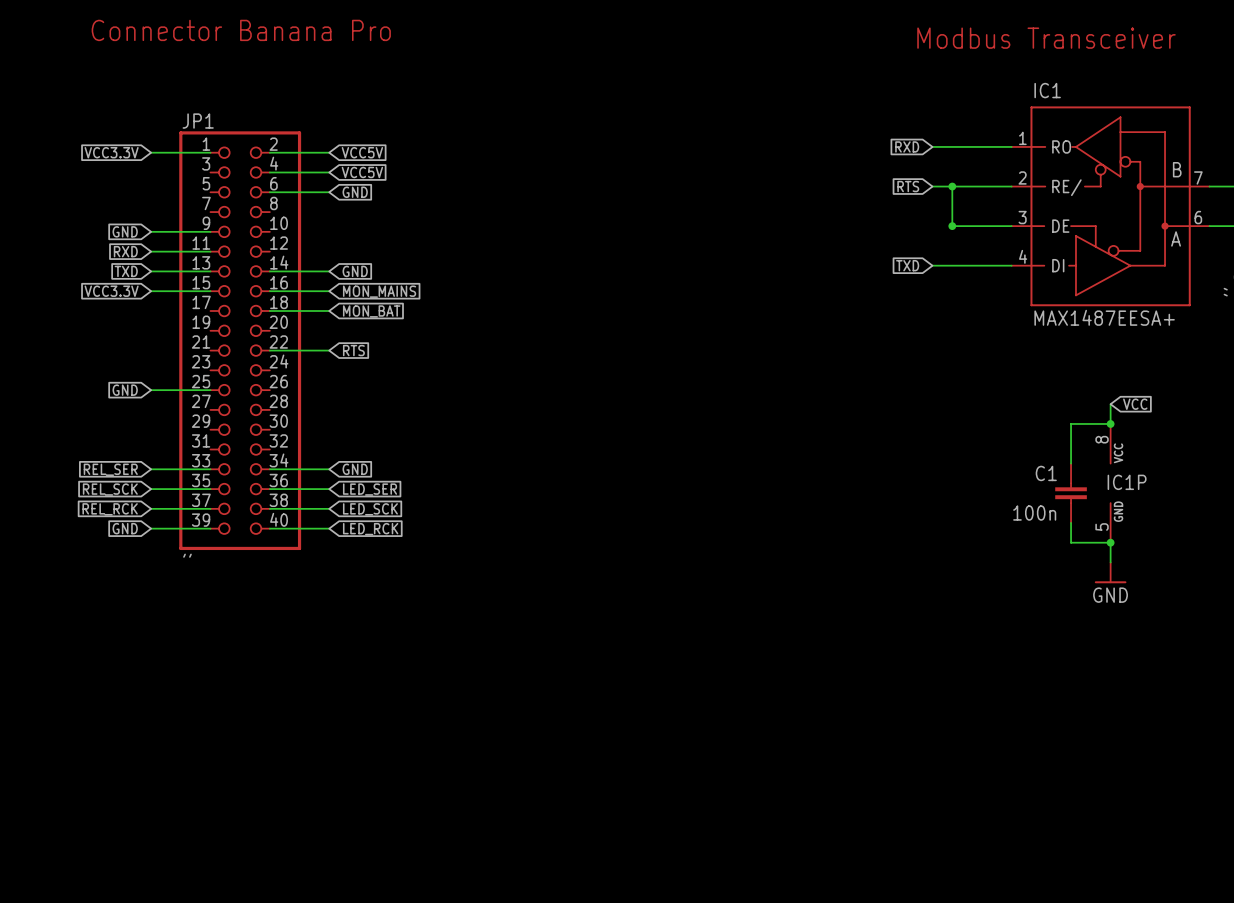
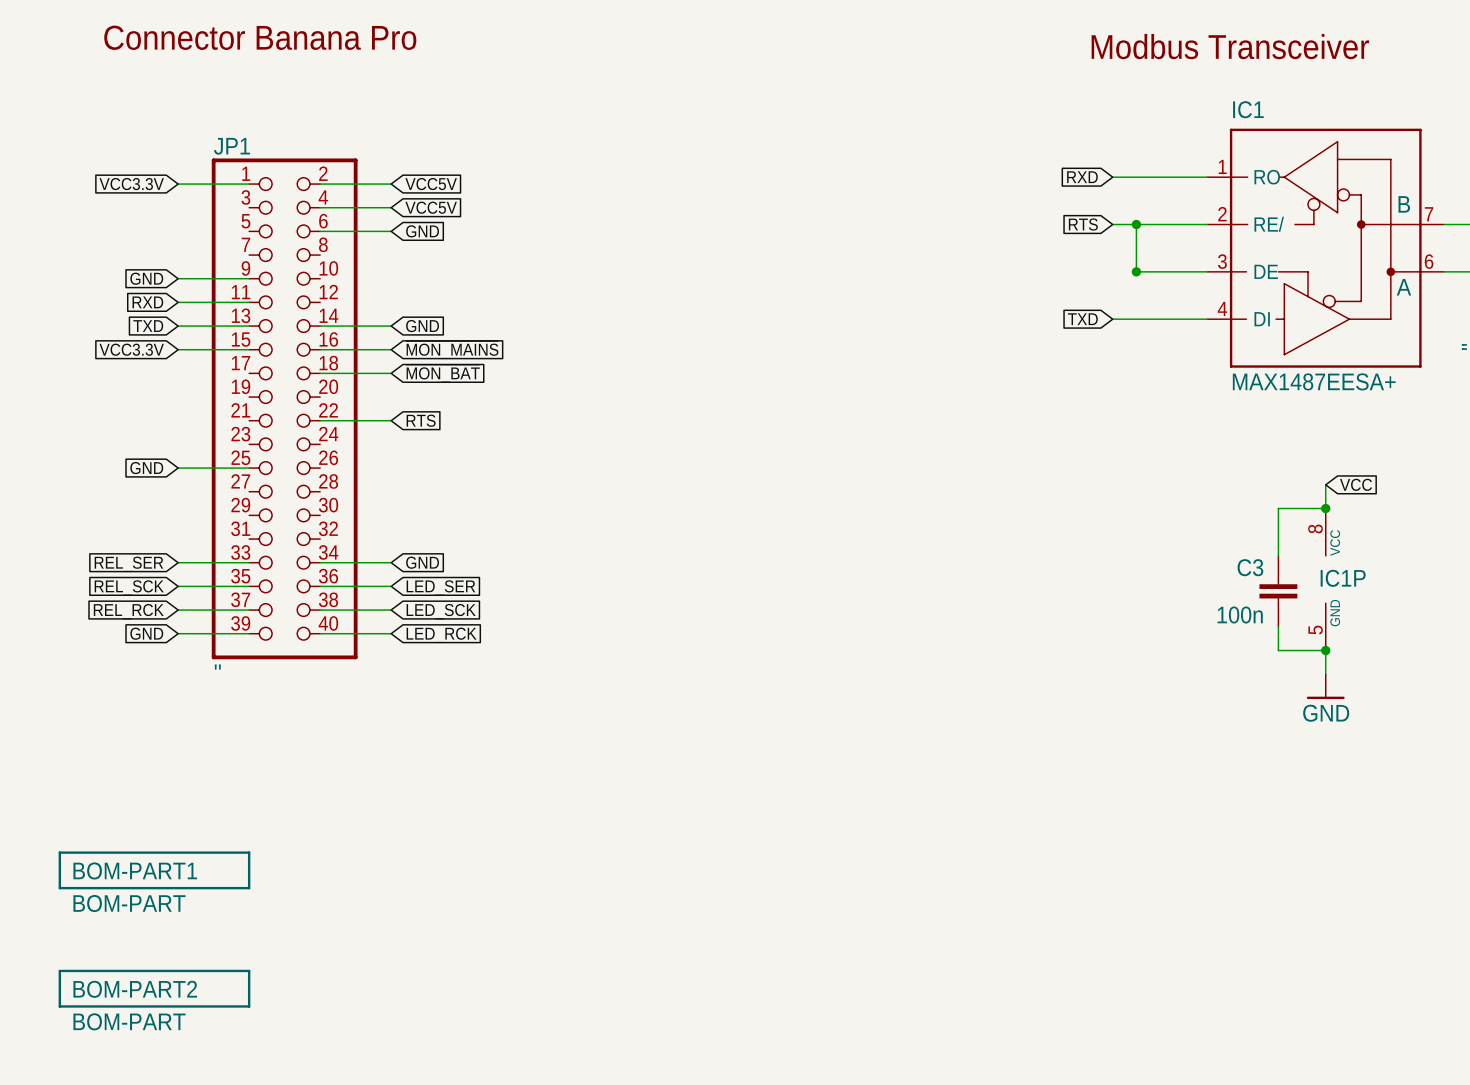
global label: MON_MAINS (379, 291) -> ~{MON_MAINS} (452, 350)
global label: MON_BAT (371, 311) -> ~{MON_BAT} (443, 373)
C1 name: C1 (1046, 473) -> C3 (1250, 567)
BOM-PART1: none -> BOM-PART (154, 870)
BOM-PART2: none -> BOM-PART (154, 988)

